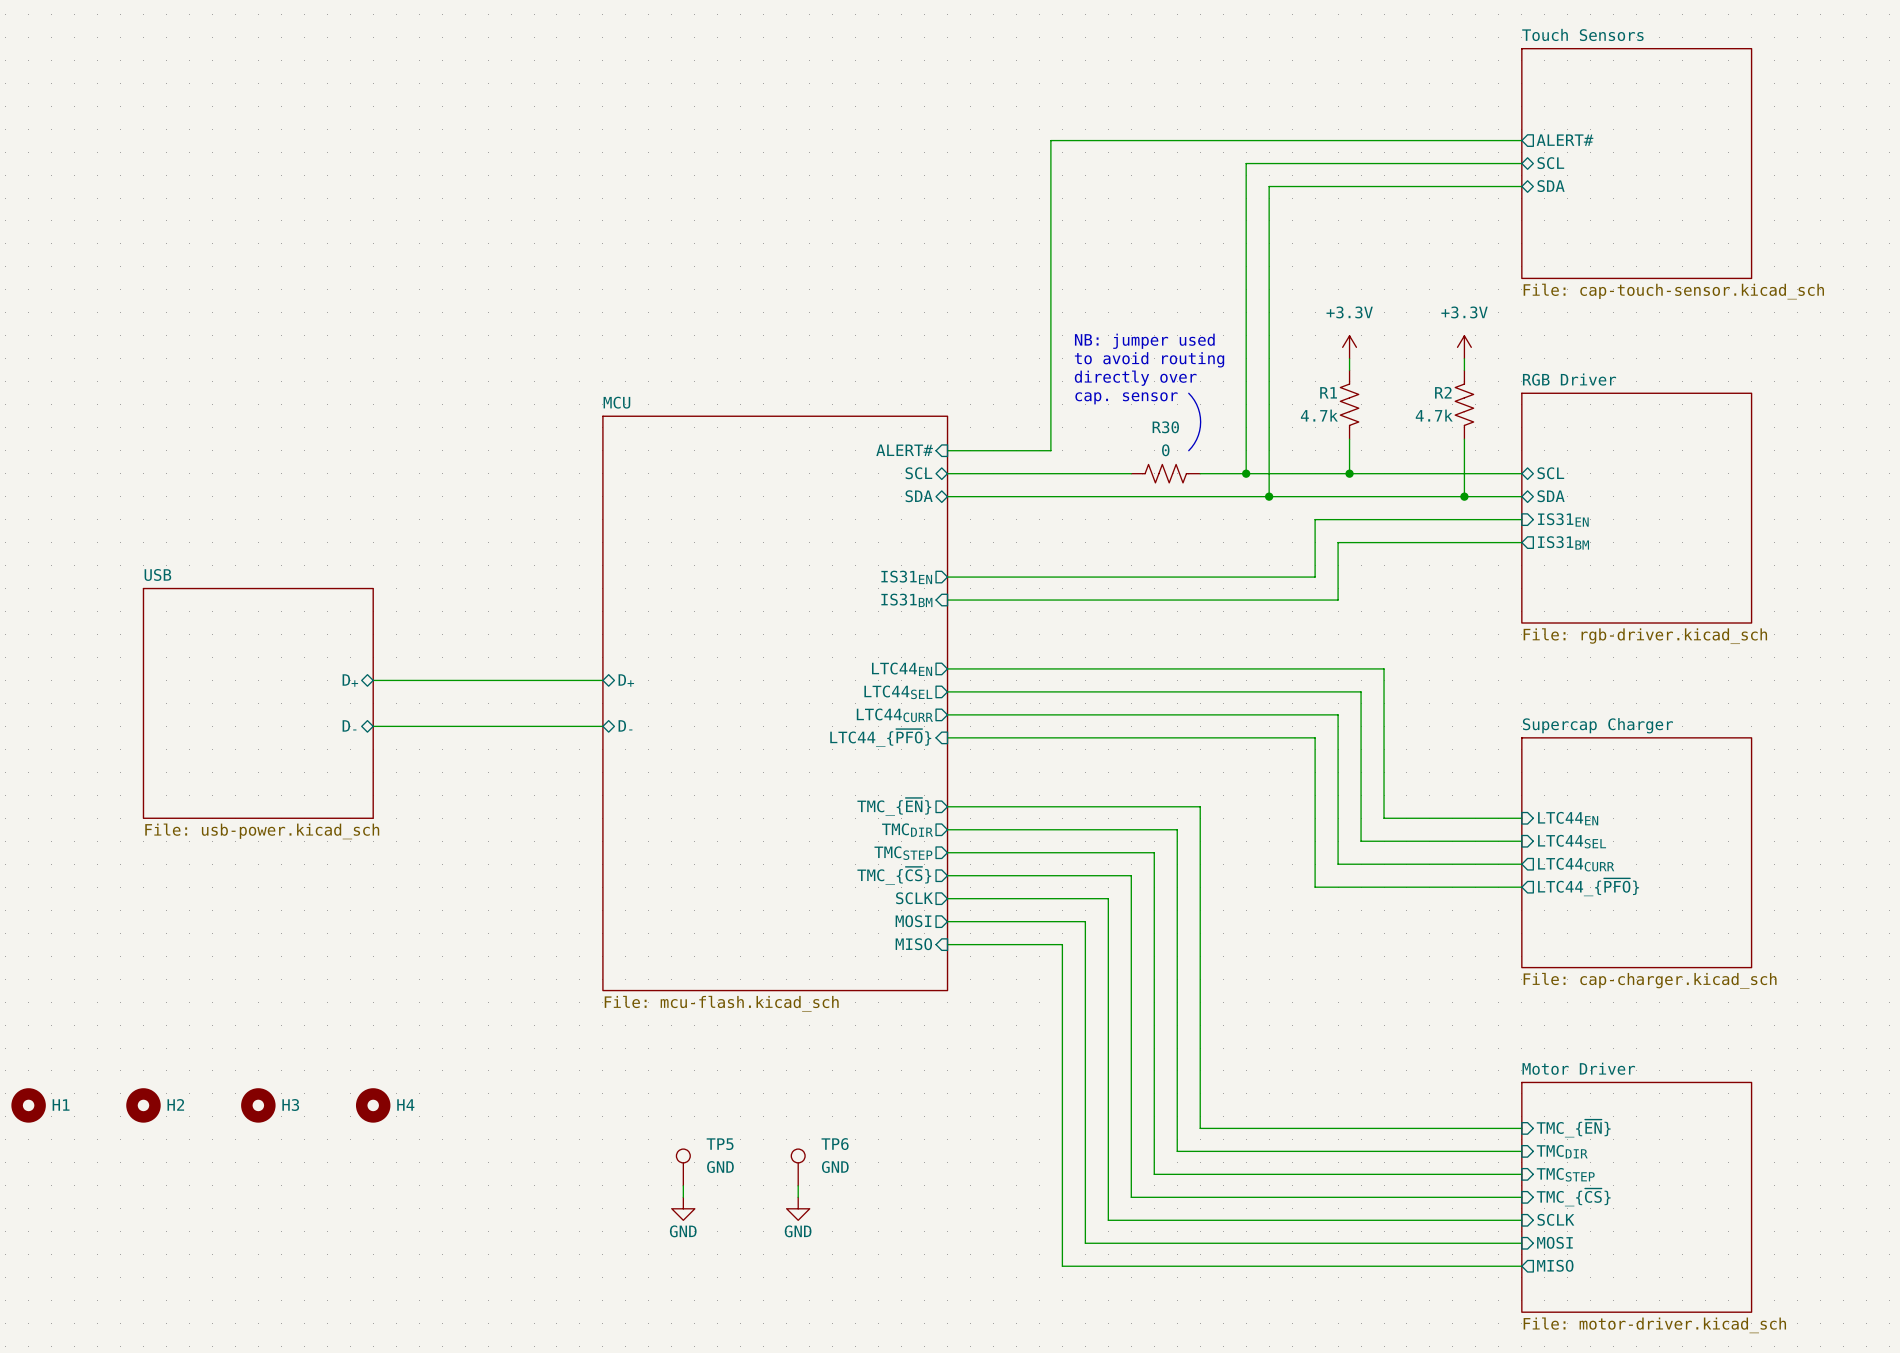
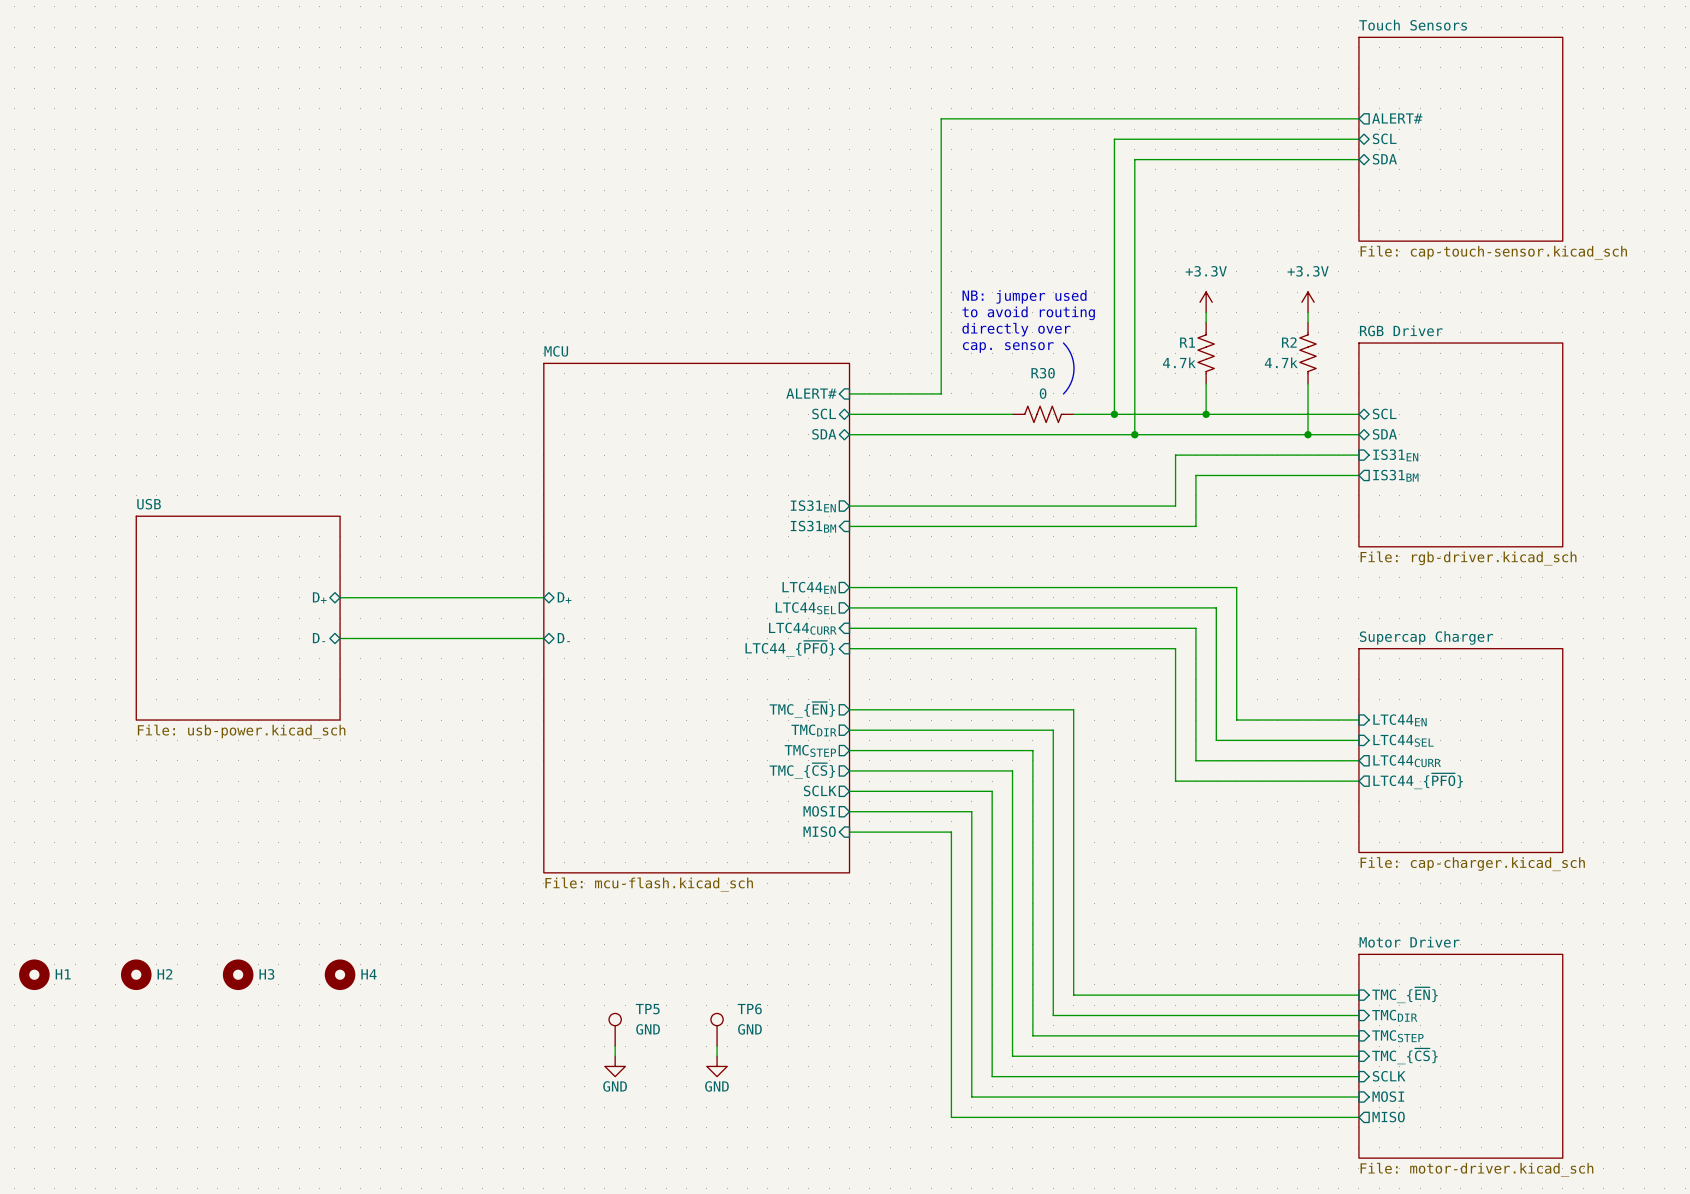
sheet pin shape: output (894, 715) -> input (802, 628)

